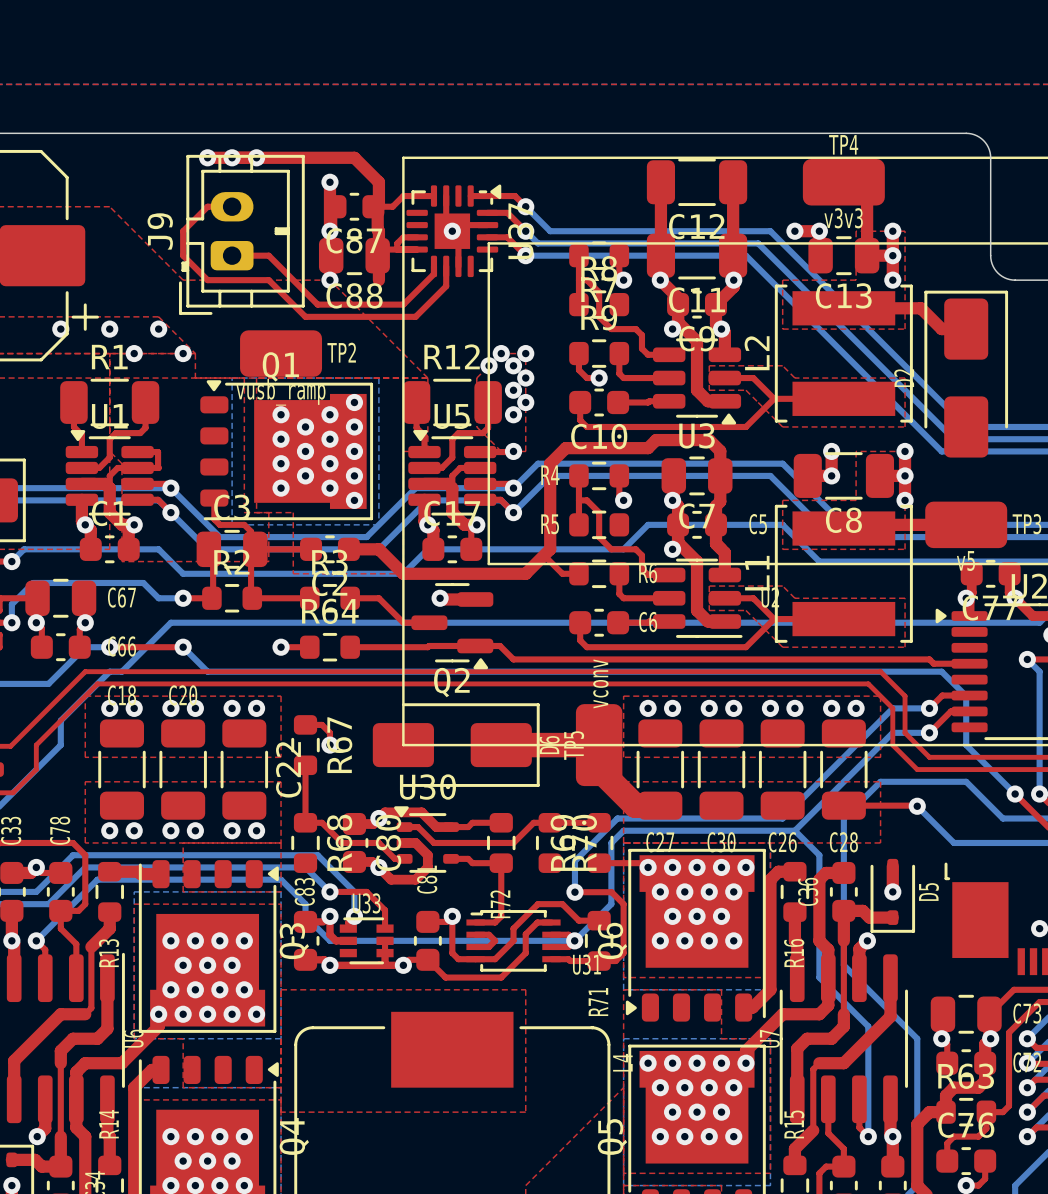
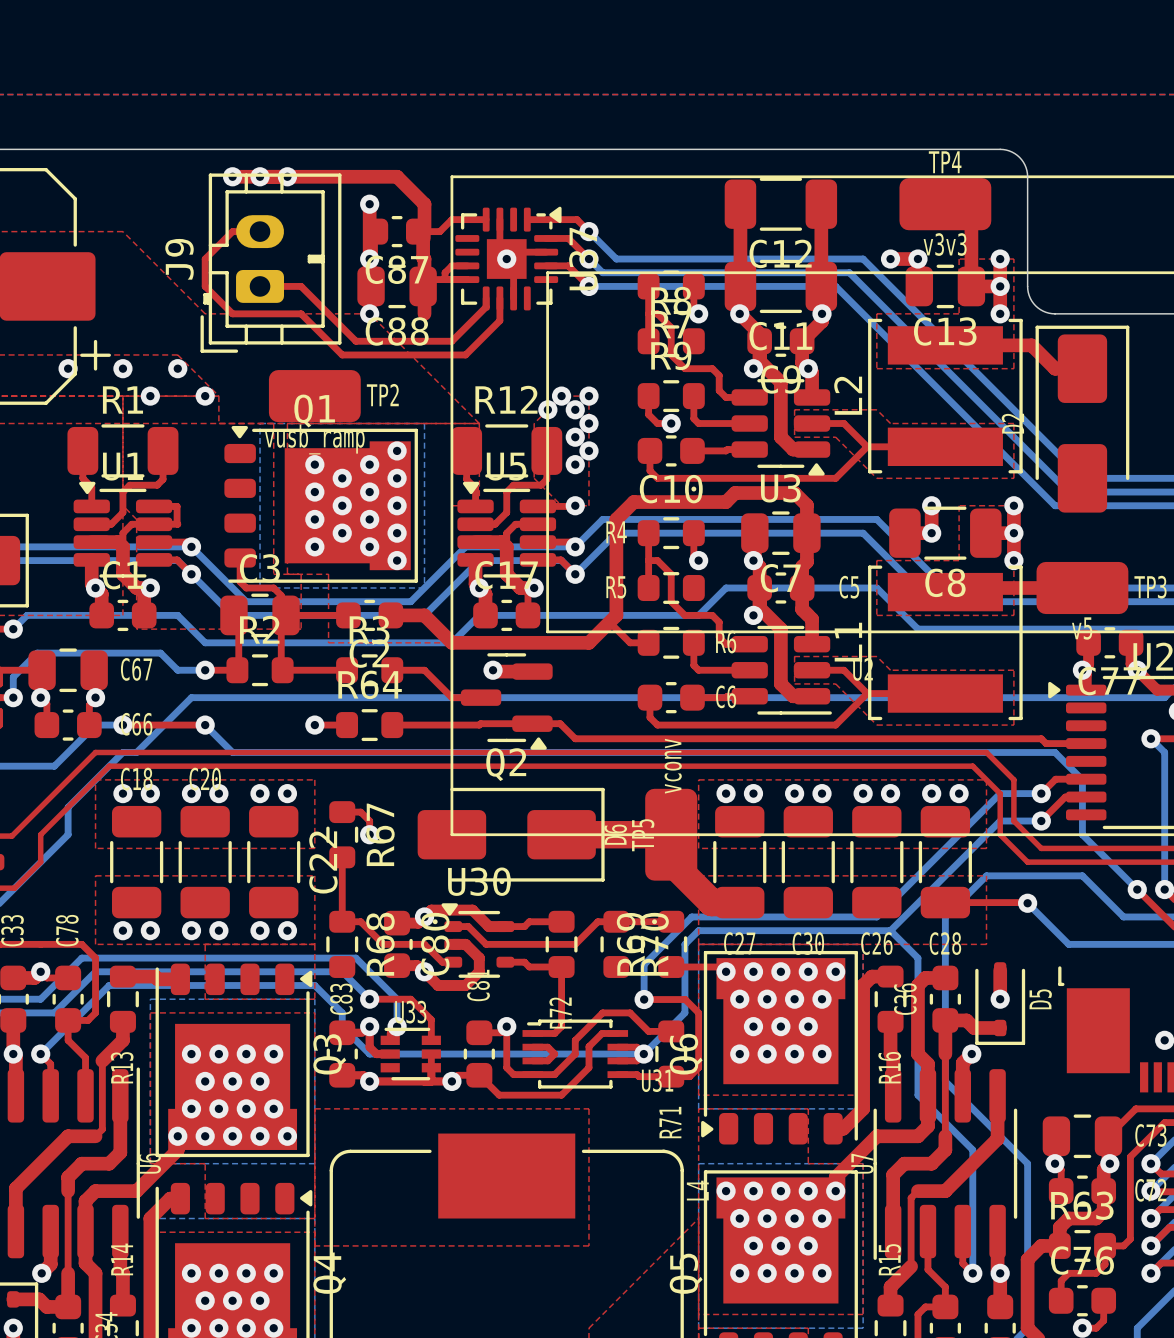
board edge: (892, 133) (968, 133) (976, 135) (985, 142) (990, 157) (991, 261) (999, 274) (1015, 280) -> (1000, 149) (1009, 150) (1017, 155) (1023, 162) (1026, 170) (1027, 286) (1029, 295) (1033, 303) (1043, 311) (1051, 313) (1137, 313)

